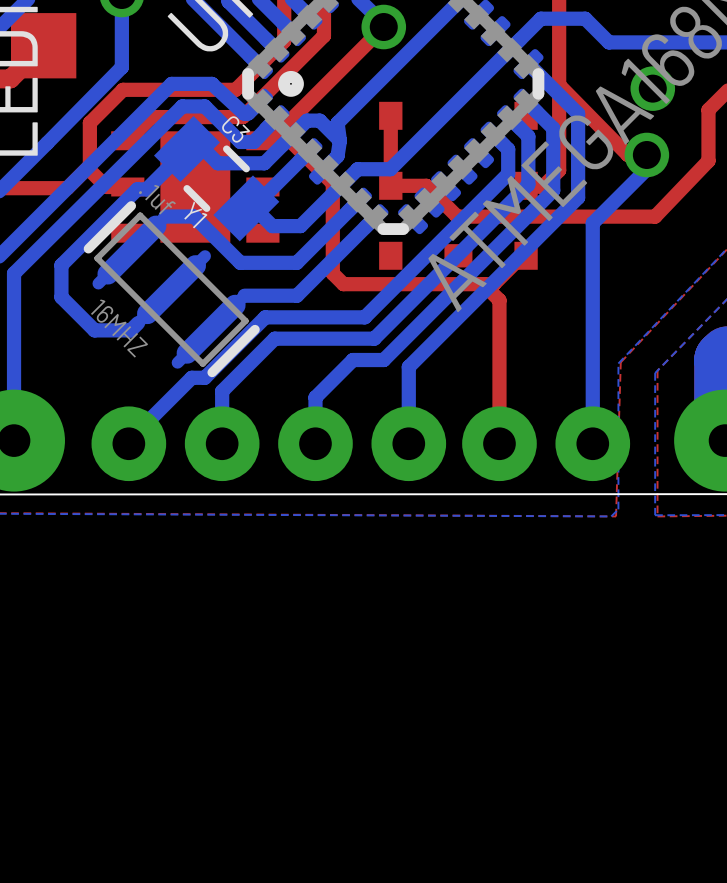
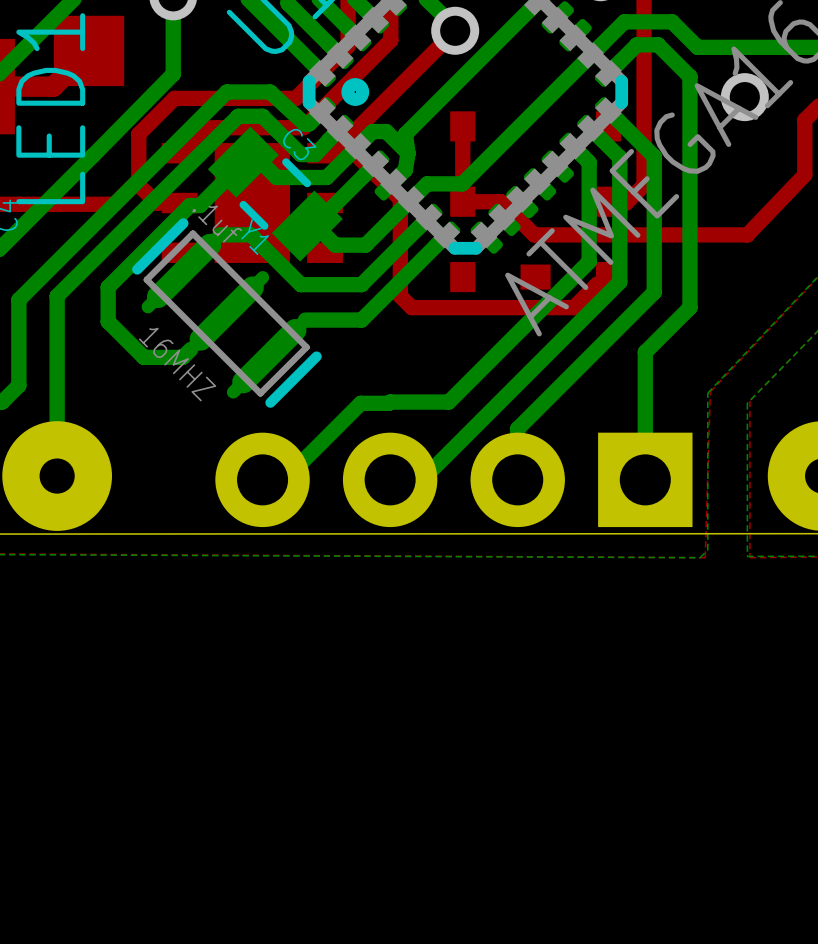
bottom track: (528, 64) (578, 113) (578, 197) (408, 366) (408, 443) -> (611, 70) (636, 44) (658, 44) (689, 76) (689, 307) (645, 352) (645, 479)
top track: (559, 85) (627, 154) (646, 154) -> none
bottom track: (553, 128) (553, 190) (383, 360) (352, 360) (315, 397) (315, 443) -> (637, 139) (654, 156) (654, 292) (517, 428) (517, 479)
bottom track: (528, 136) (528, 184) (374, 338) (274, 338) (222, 391) (222, 443) -> (610, 148) (619, 157) (619, 282) (422, 479) (390, 479)
bottom track: (646, 154) (646, 169) (592, 223) (592, 443) -> none
via: (646, 154) -> none
bottom track: (508, 173) (364, 317) (265, 317) (204, 377) (191, 377) (128, 440) (128, 443) -> (589, 188) (589, 261) (448, 402) (360, 403) (284, 479) (262, 479)
top track: (483, 284) (499, 300) (499, 443) -> none
part: (268, 443) -> none
part: (546, 443) -> none
part: none -> (453, 479)

